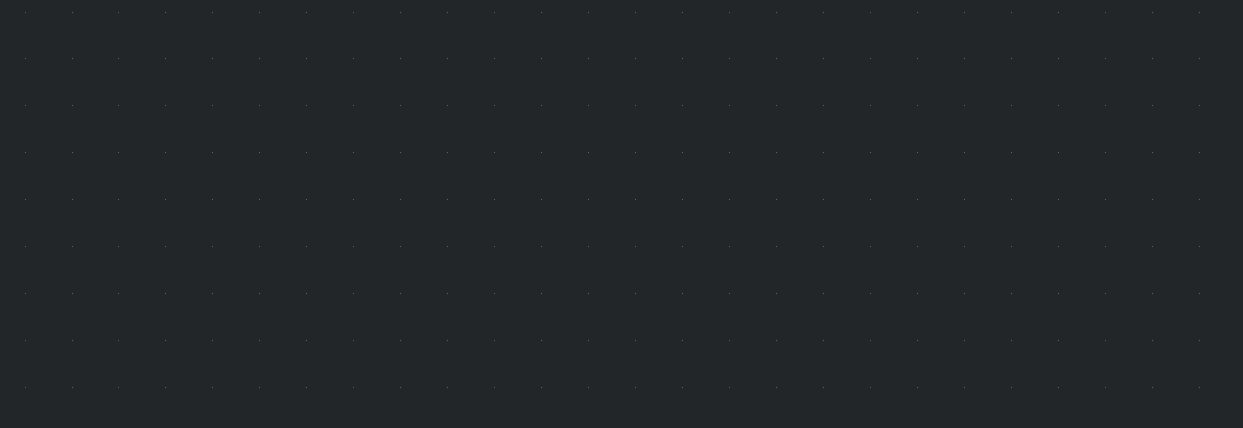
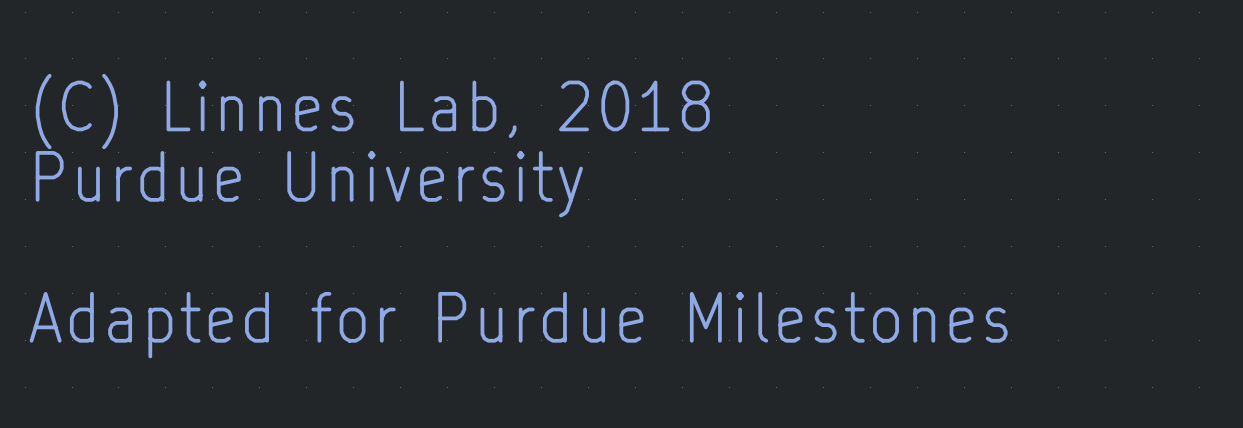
text: none -> (C) Linnes Lab, 2018 (372, 111)
text: none -> Purdue University (309, 184)
text: none -> Adapted for Purdue Milestones (518, 325)

